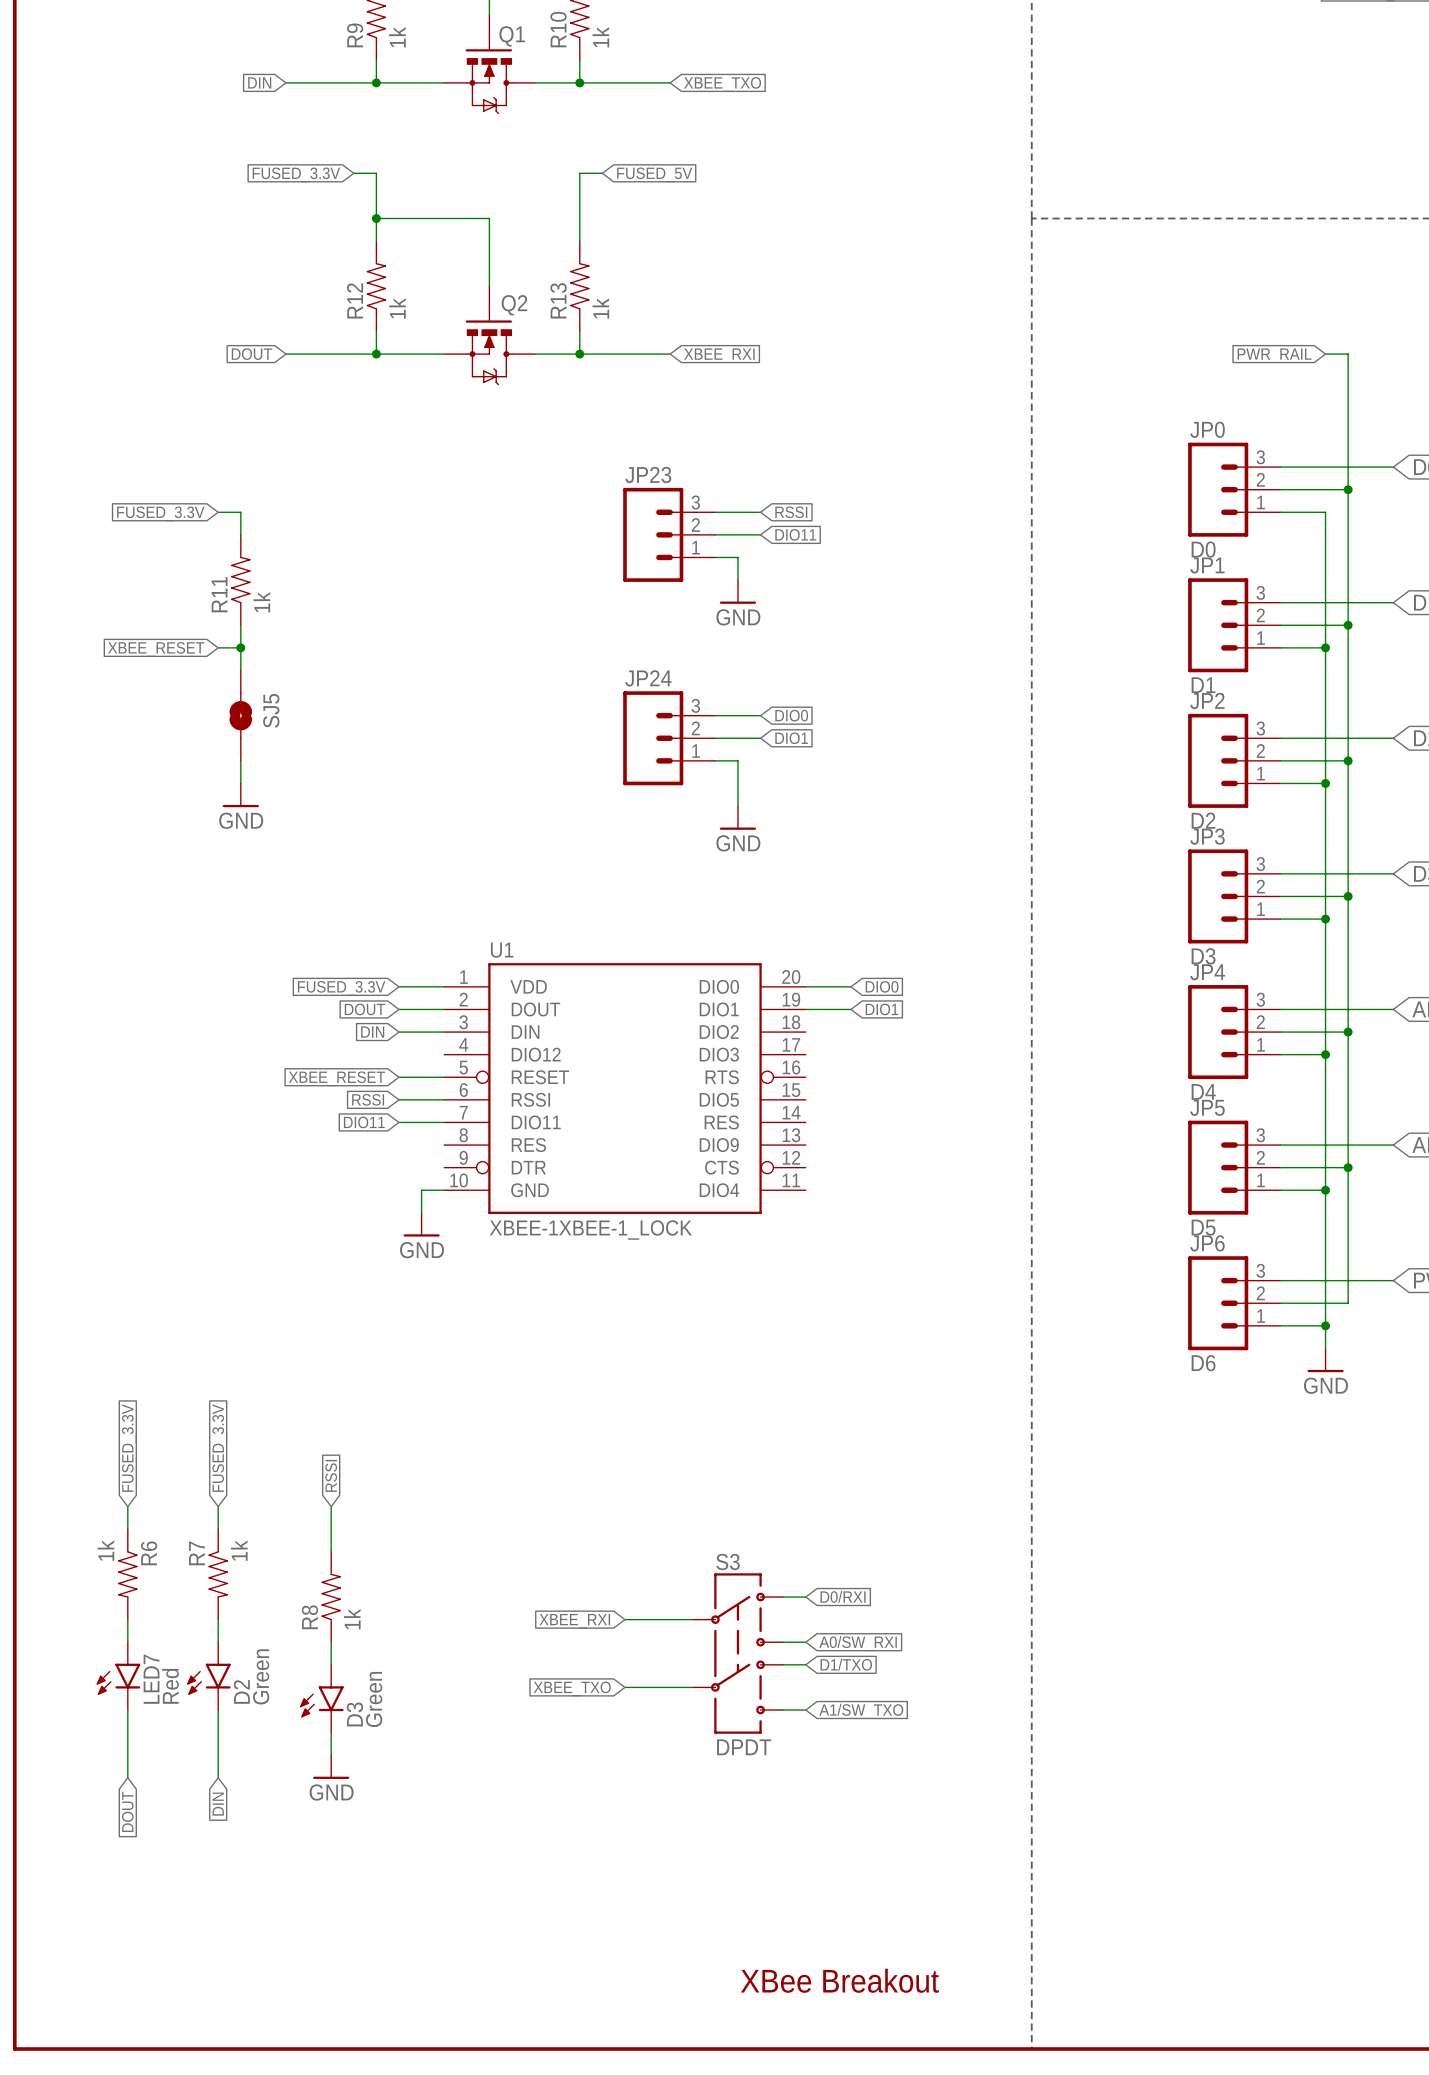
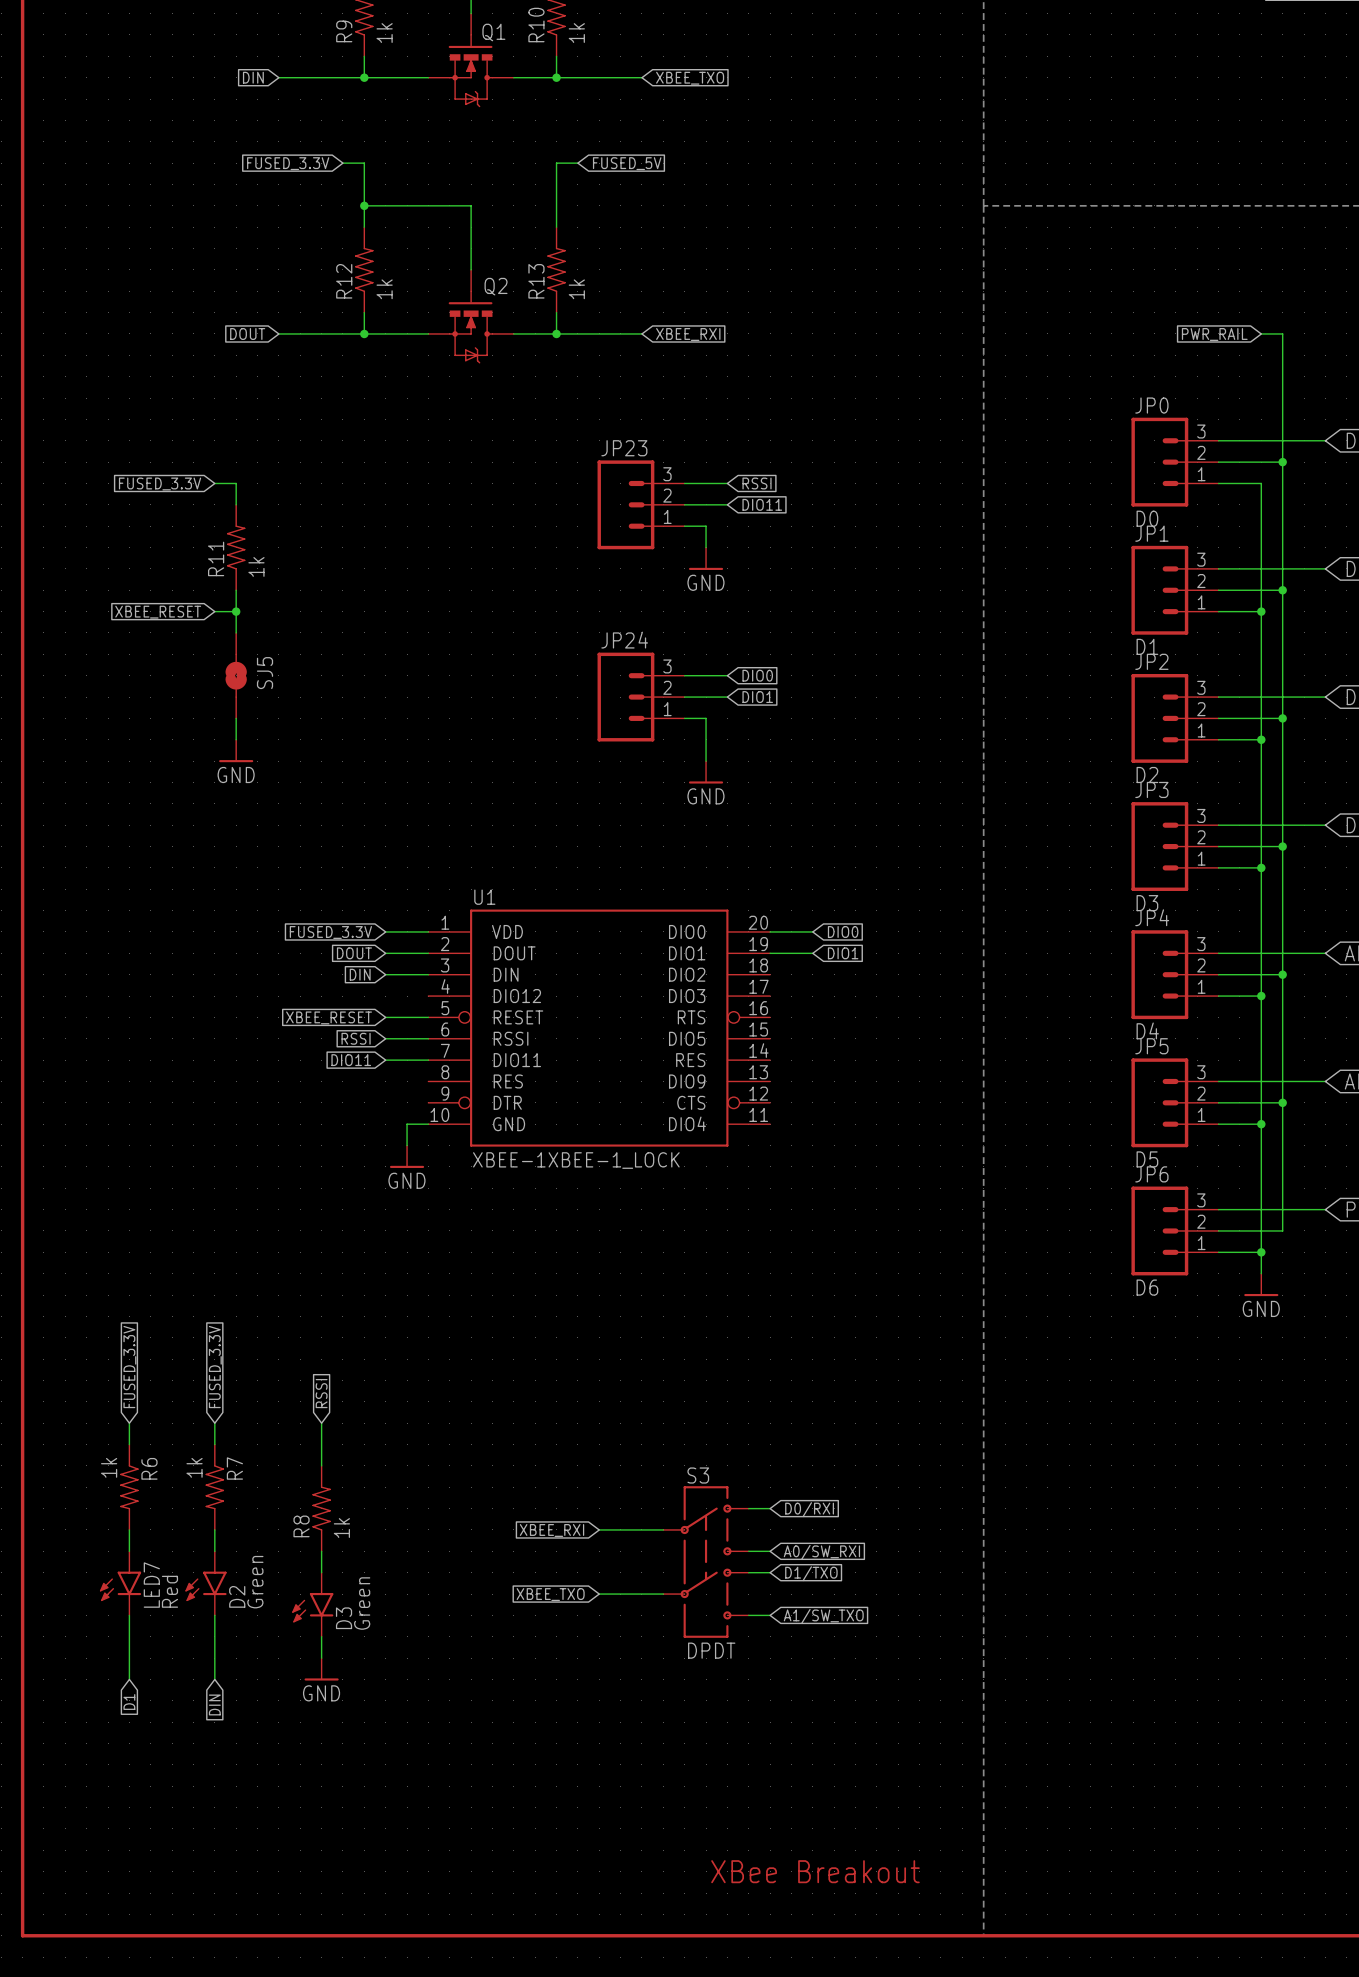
R7 flip: as is (218, 1574) -> left-right (214, 1487)
global label: DOUT (127, 1811) -> D1 (129, 1702)

